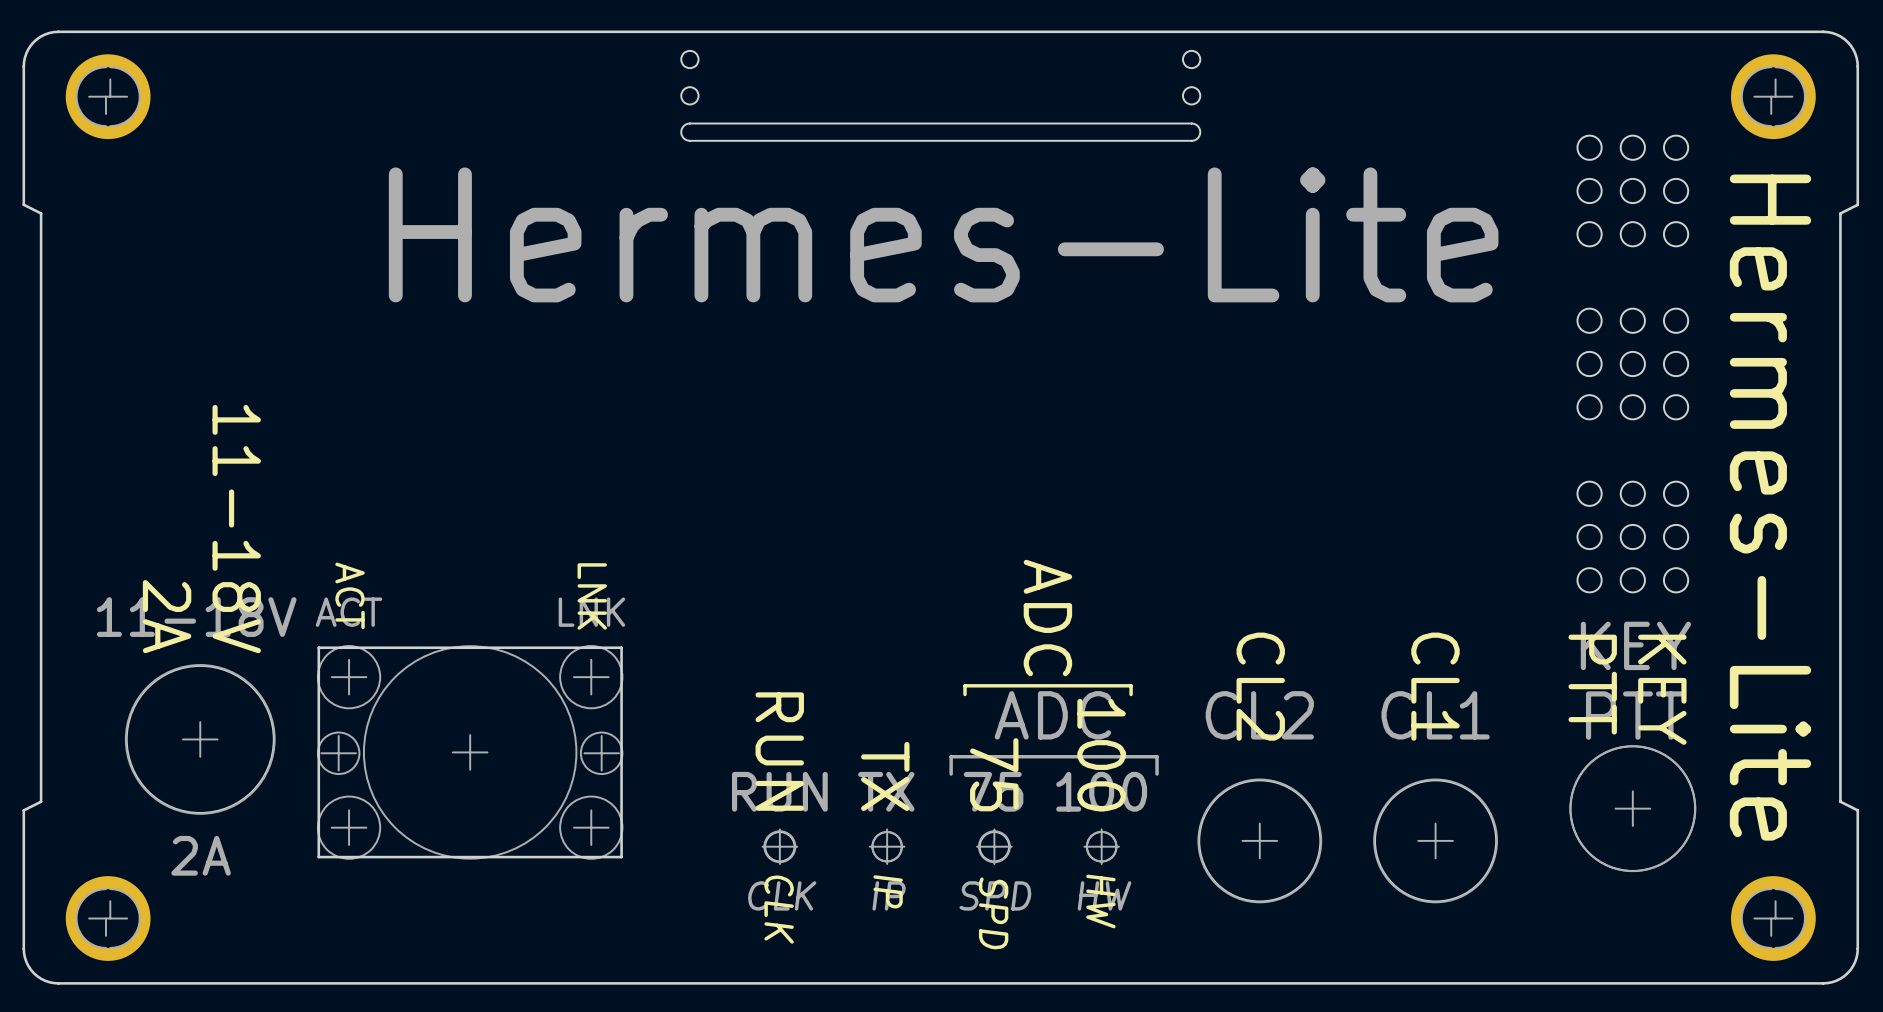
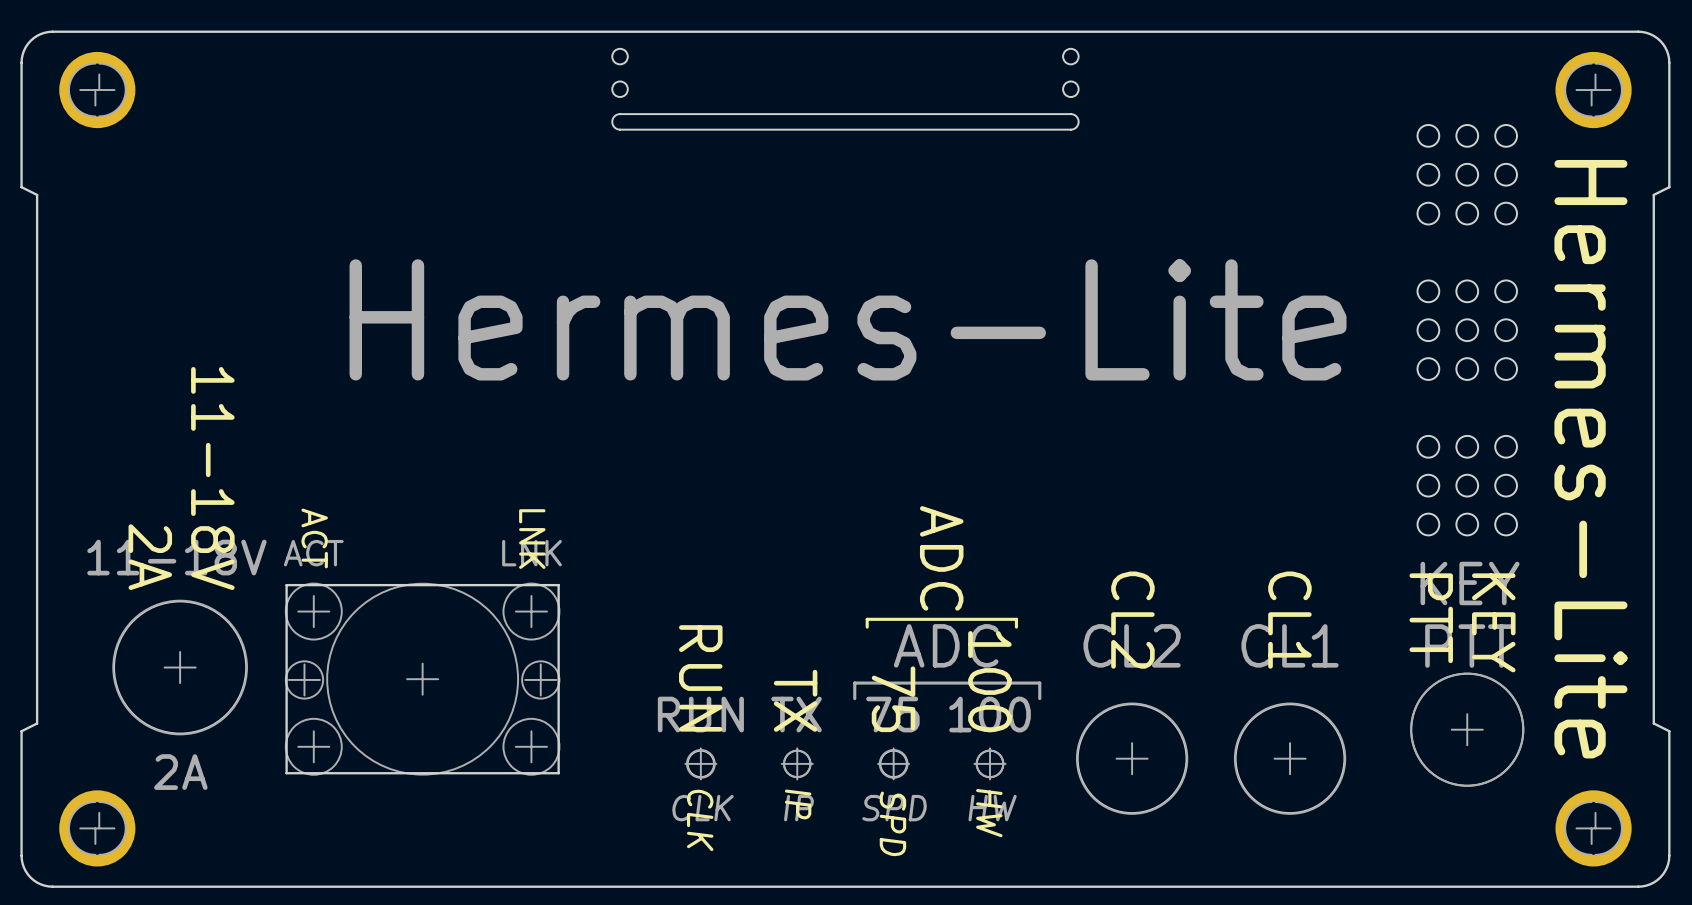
text position: Hermes-Lite (943, 234) -> Hermes-Lite (848, 319)

